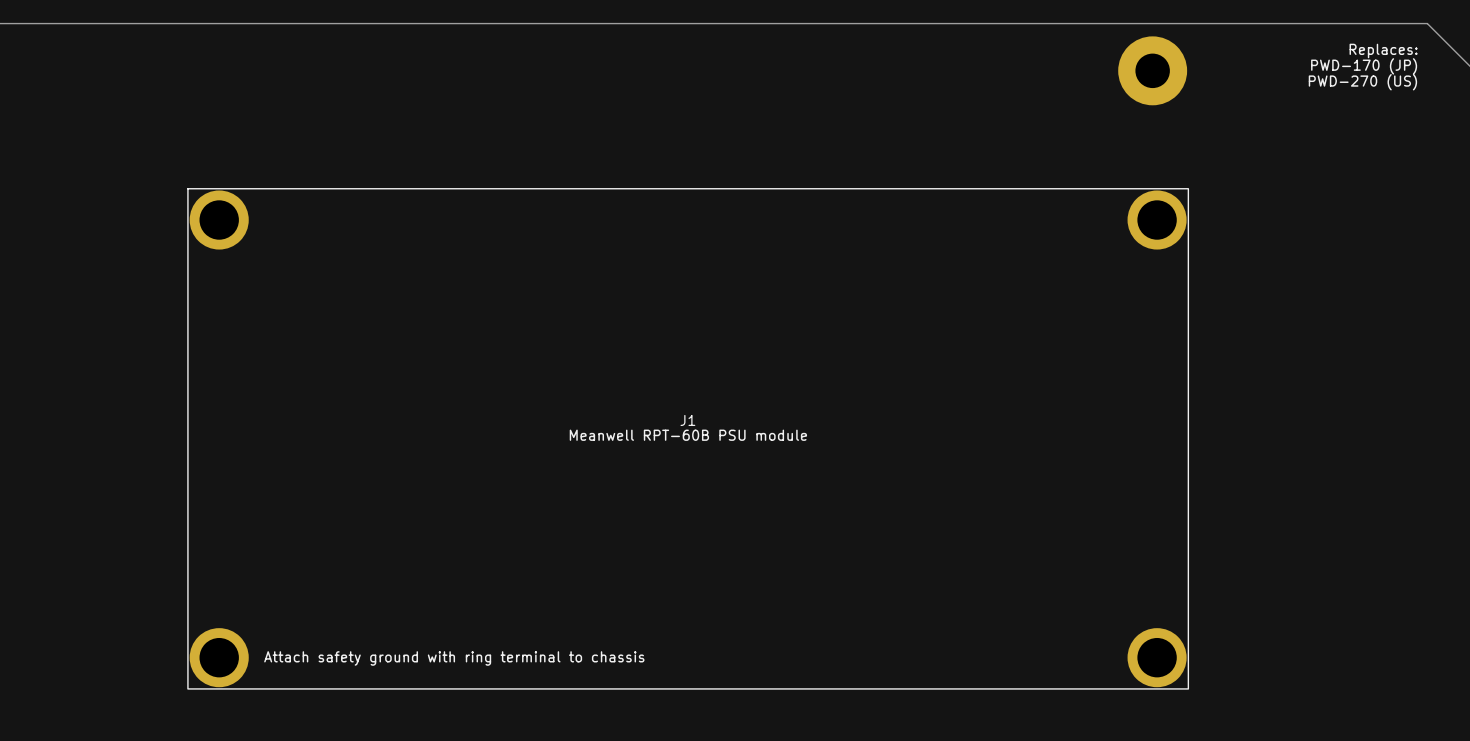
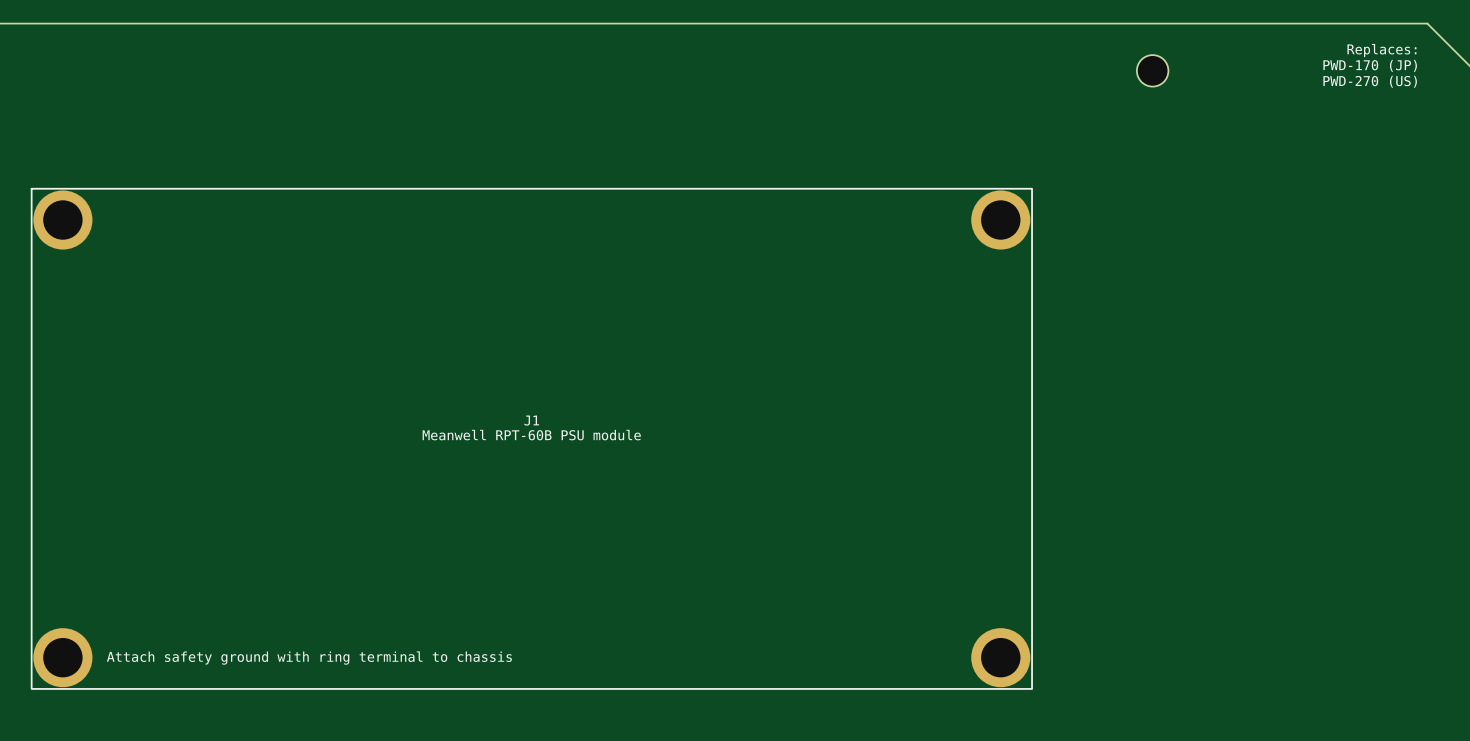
part footprint: [1118, 36, 1188, 106] -> [1136, 55, 1169, 87]
J1 position: (688, 438) -> (531, 438)
text position: Attach safety ground with ring terminal to chassis (454, 658) -> Attach safety ground with ring terminal to chassis (309, 658)

